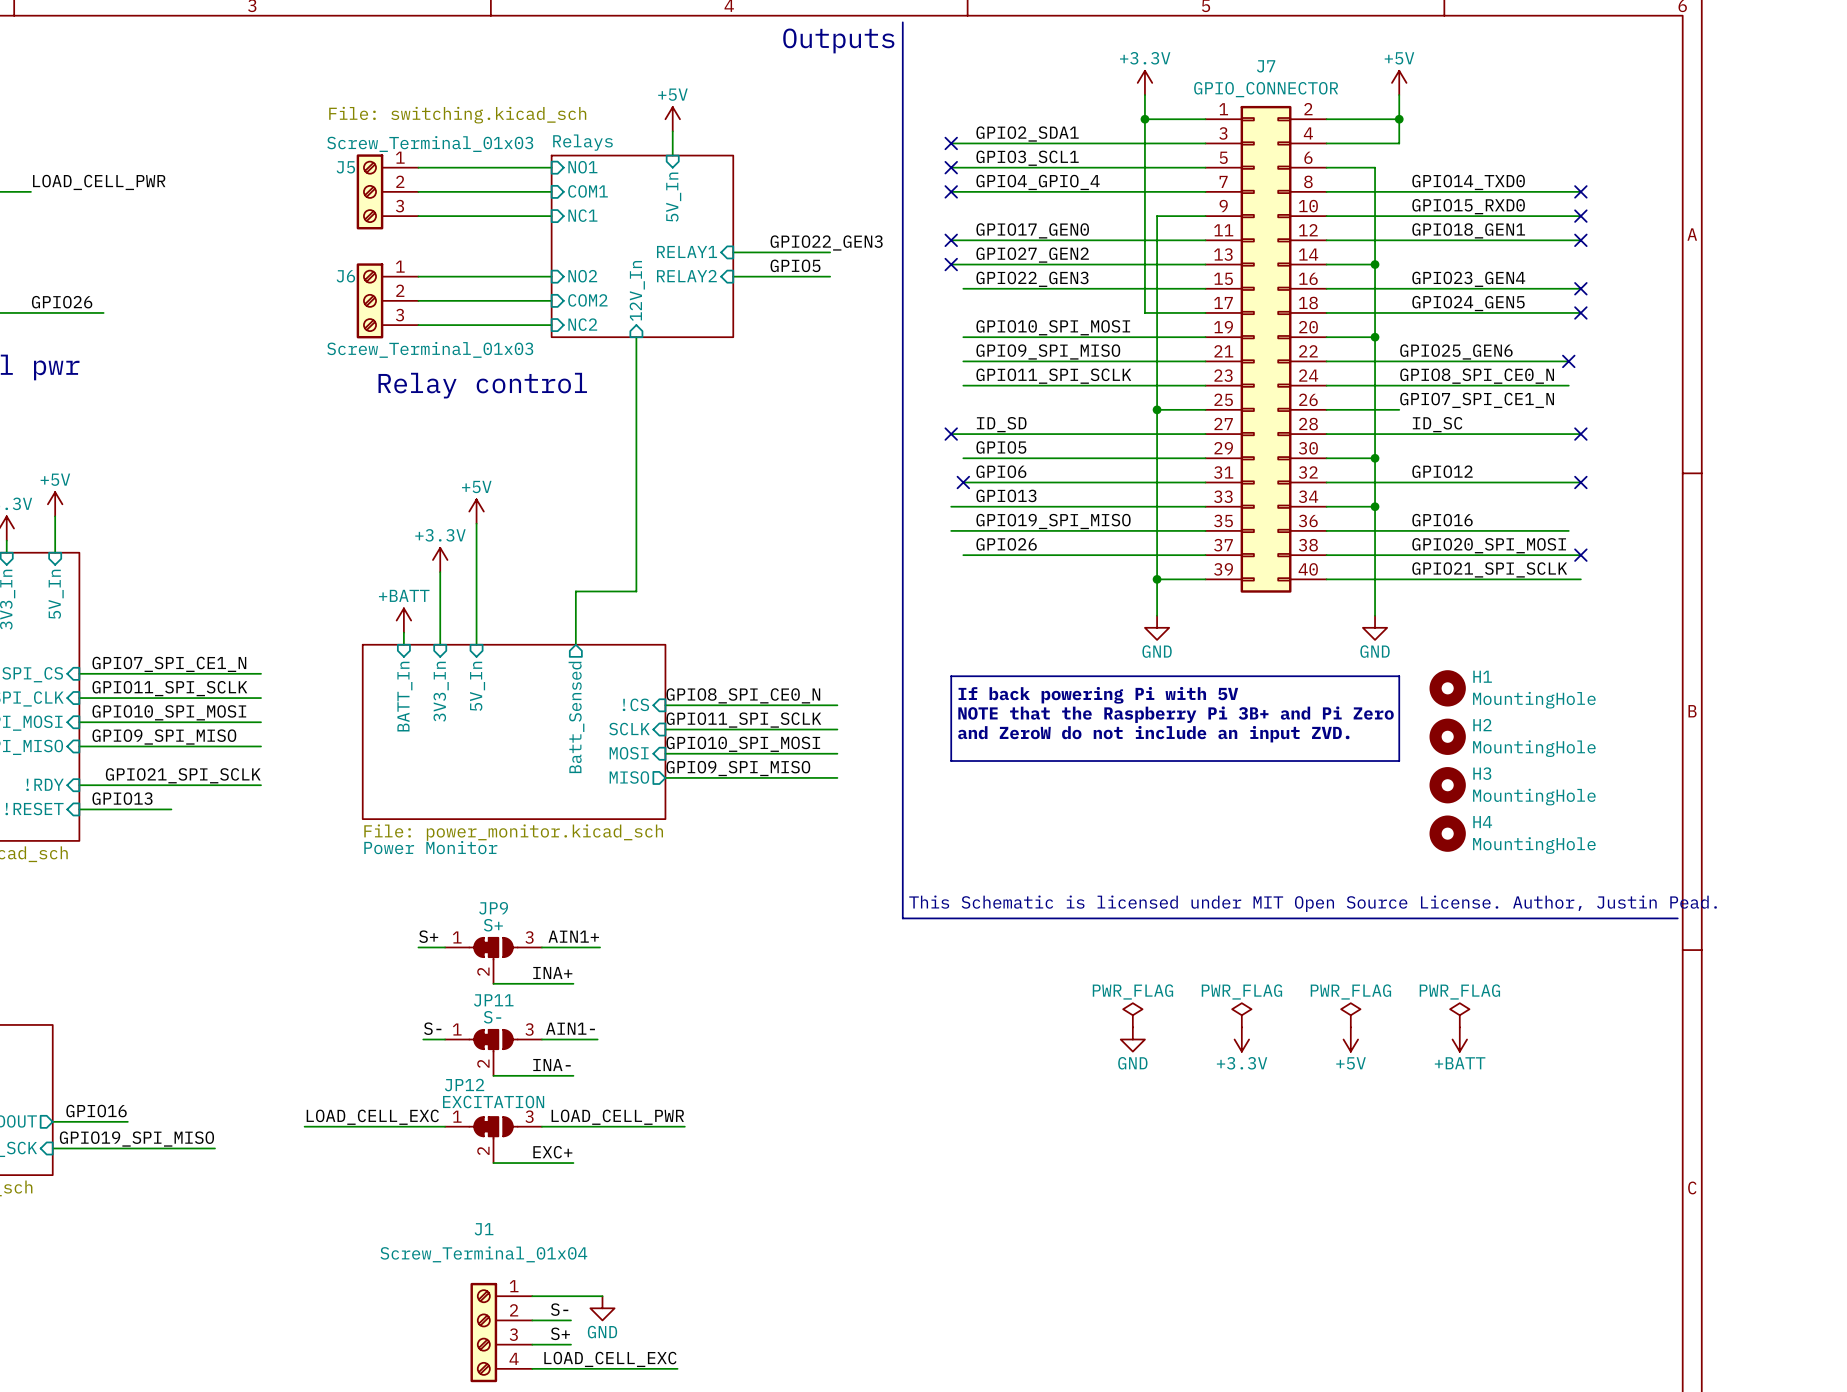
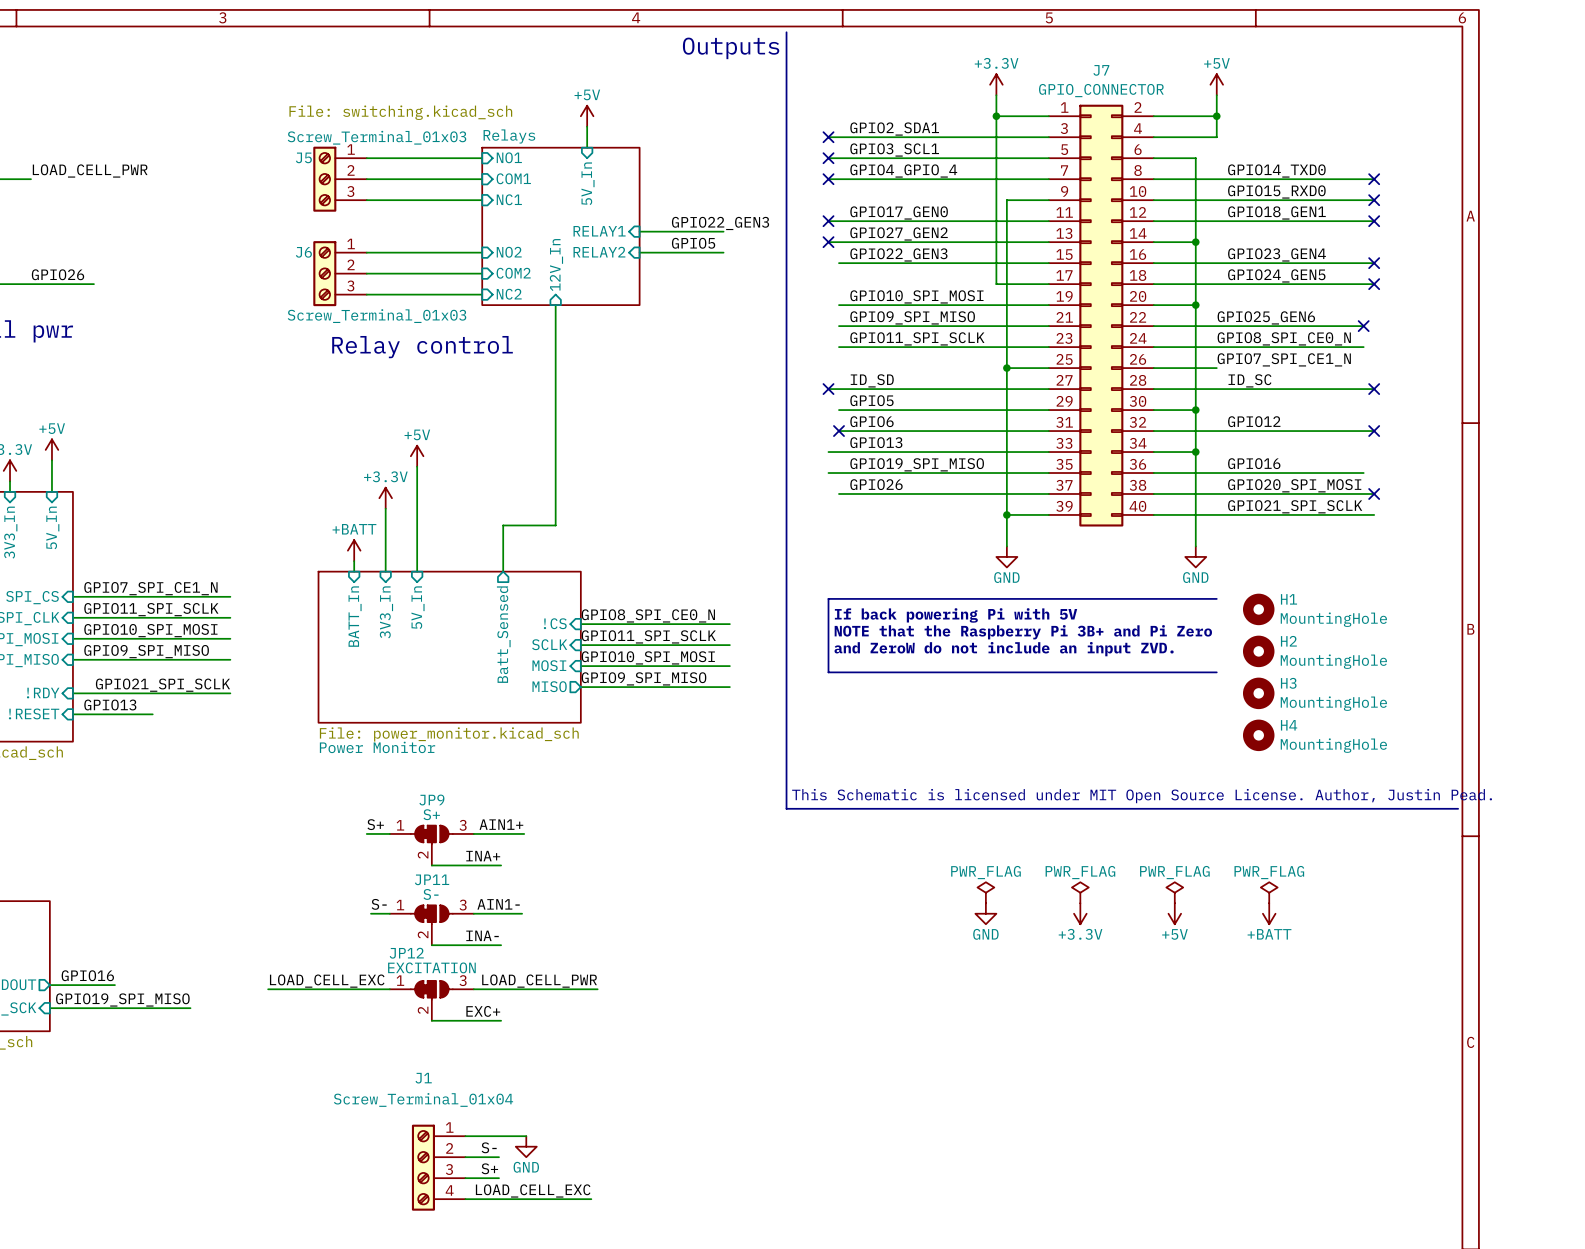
line: (1399, 676) (1399, 761) -> none

